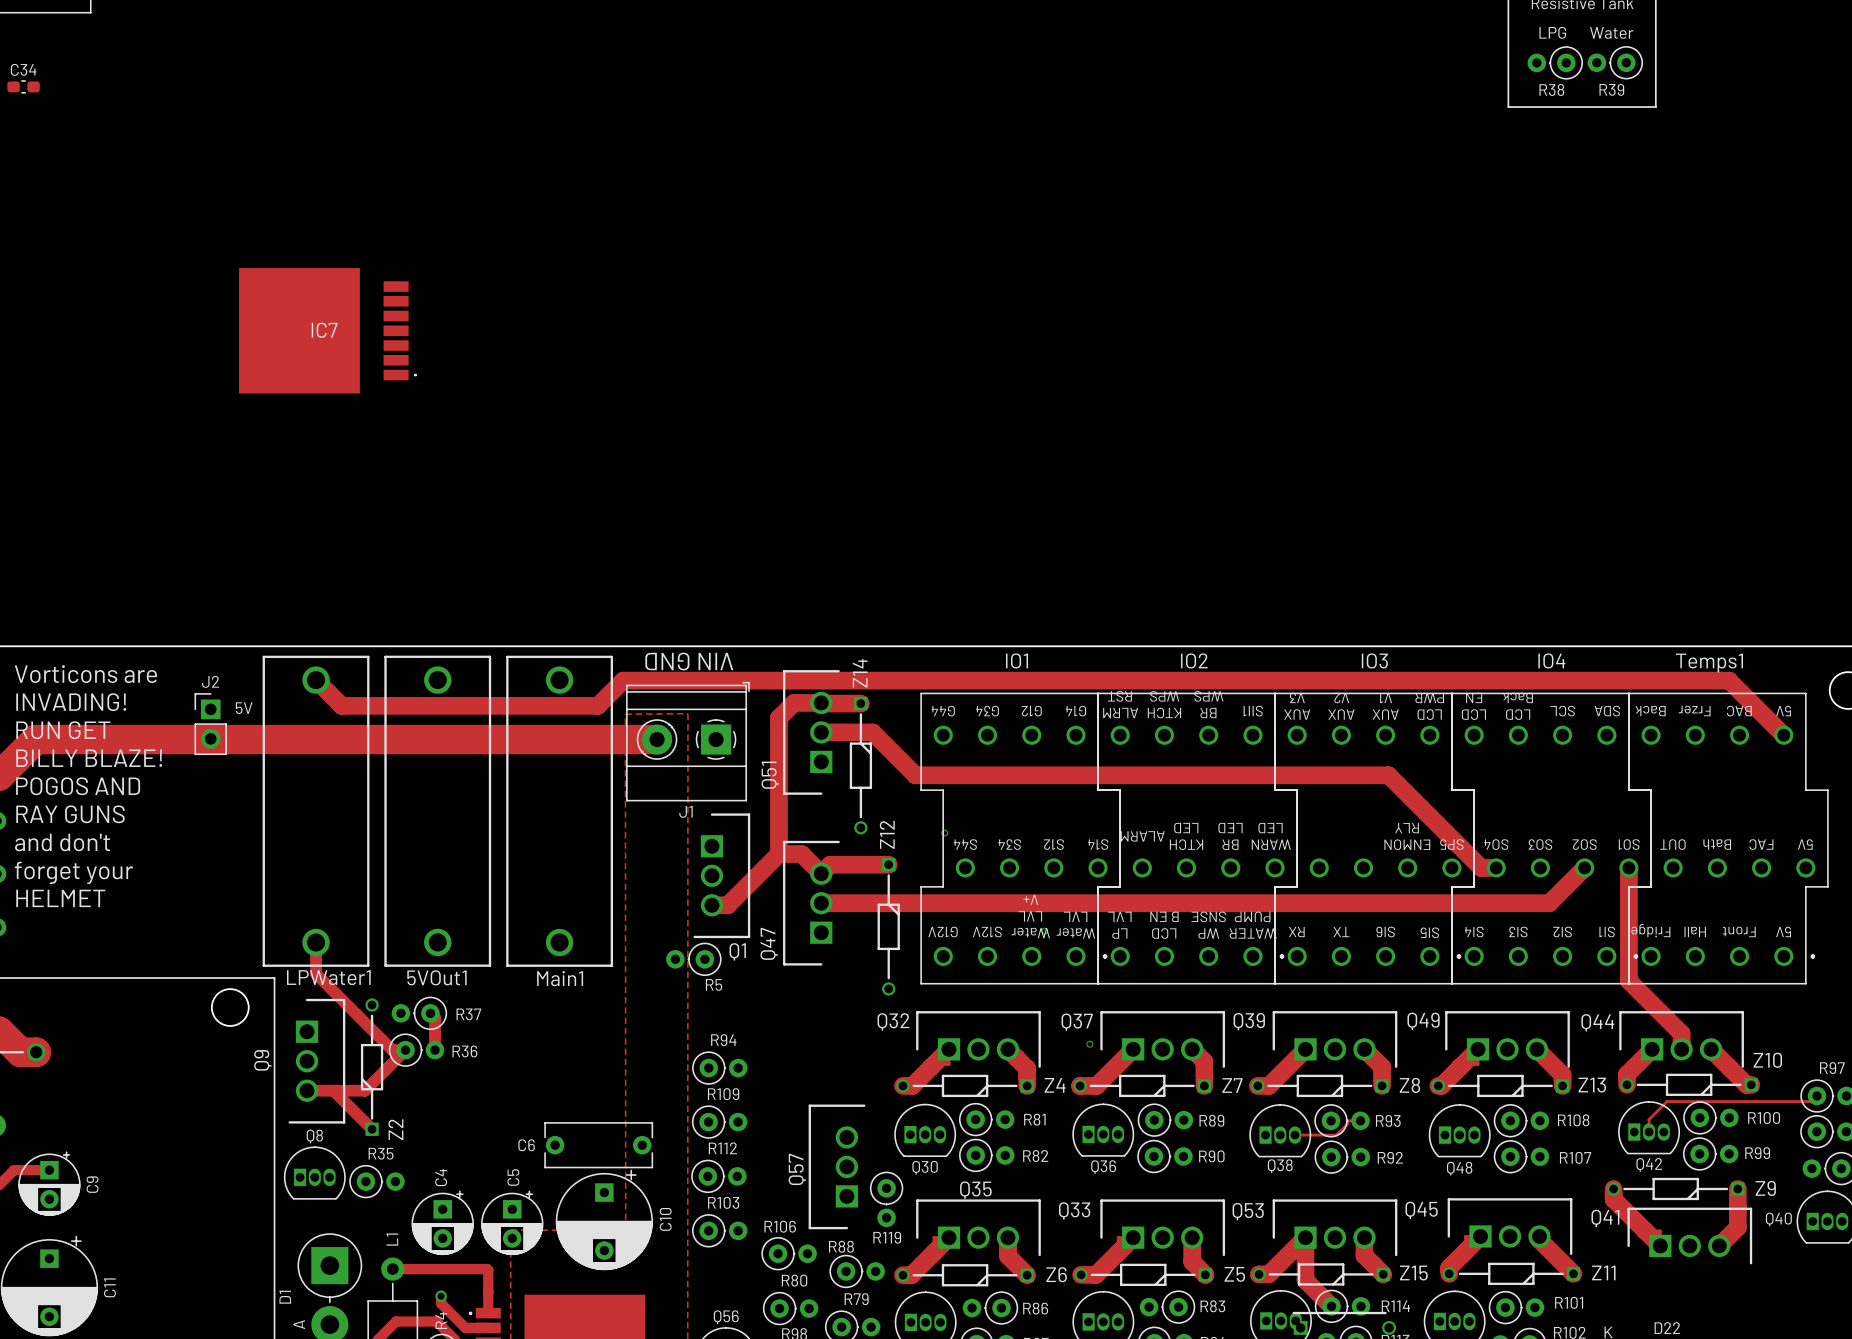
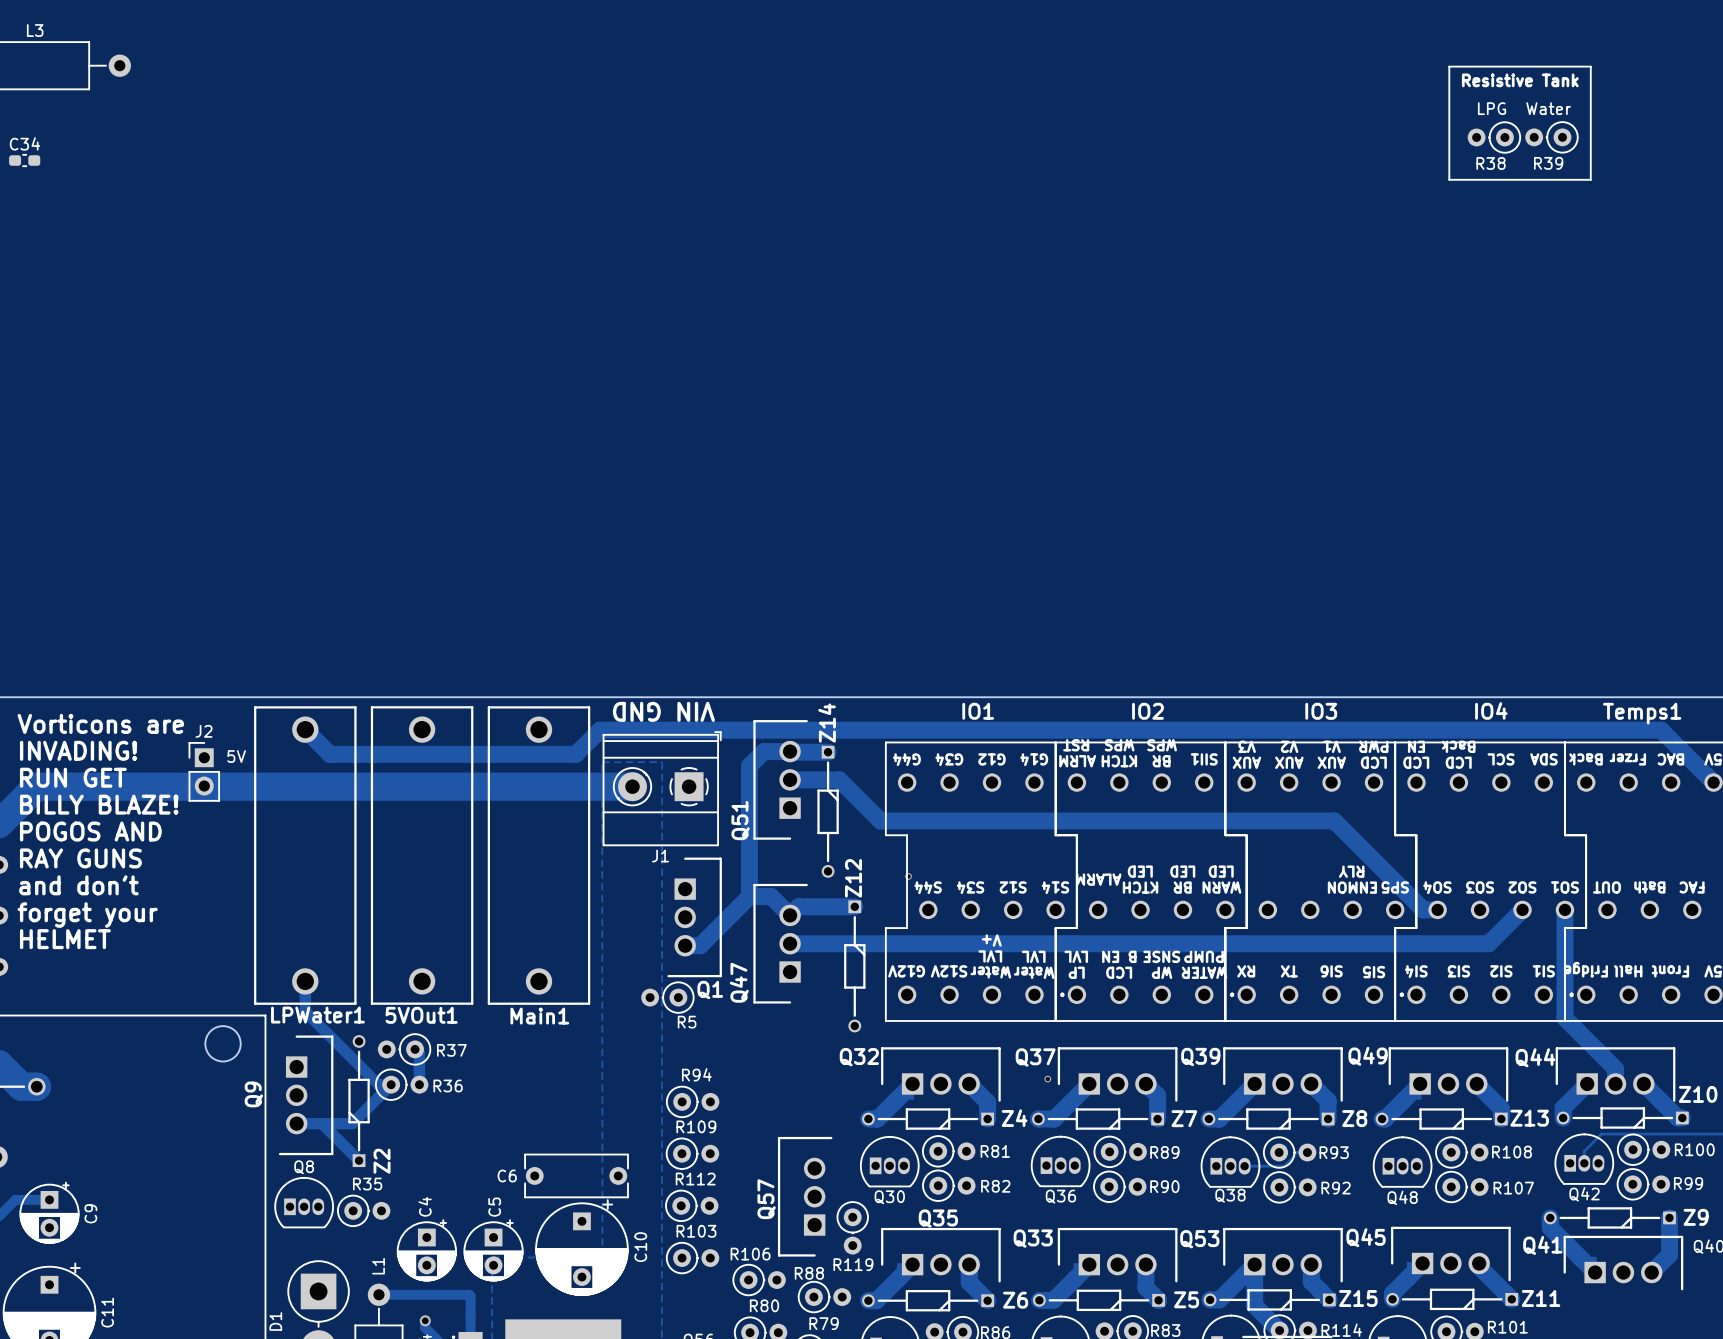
IC7: (327, 330) -> none

